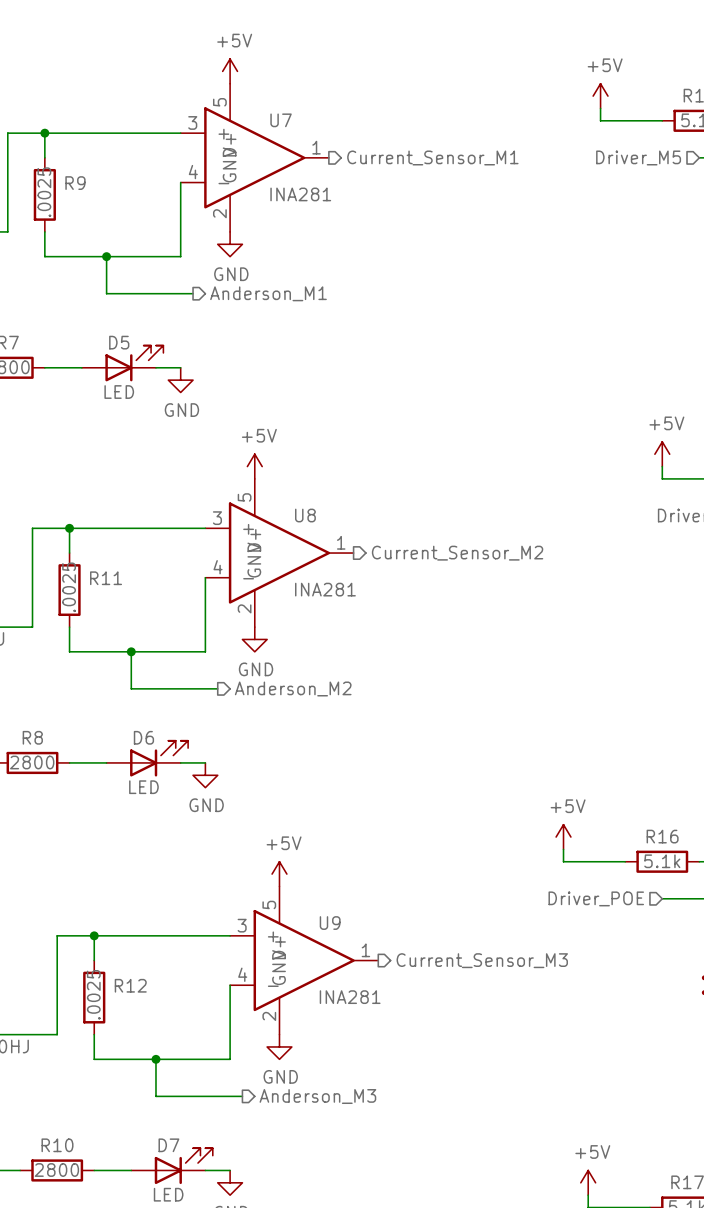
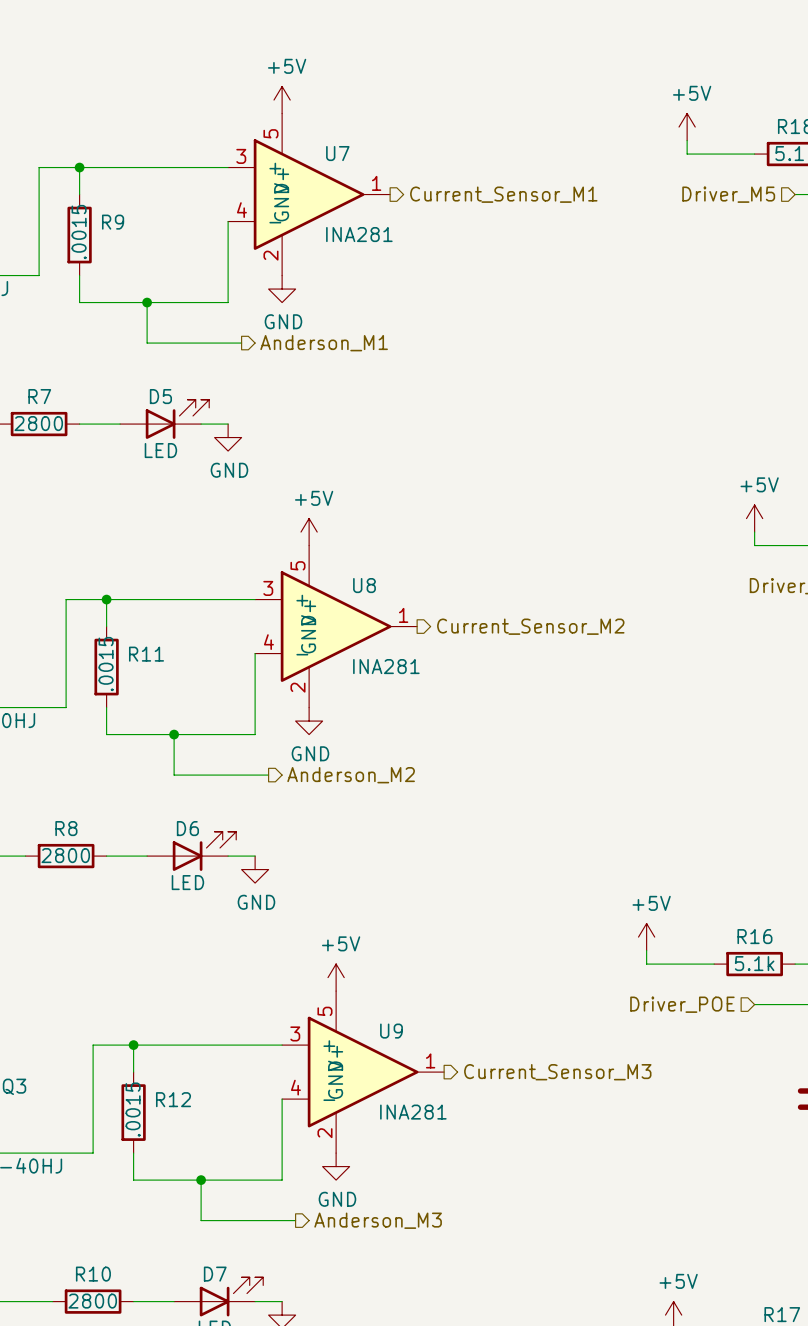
R9 value: .0025 (44, 192) -> .0015 (79, 232)
R11 value: .0025 (69, 587) -> .0015 (106, 664)
R12 value: .0025 (93, 994) -> .0015 (133, 1109)

